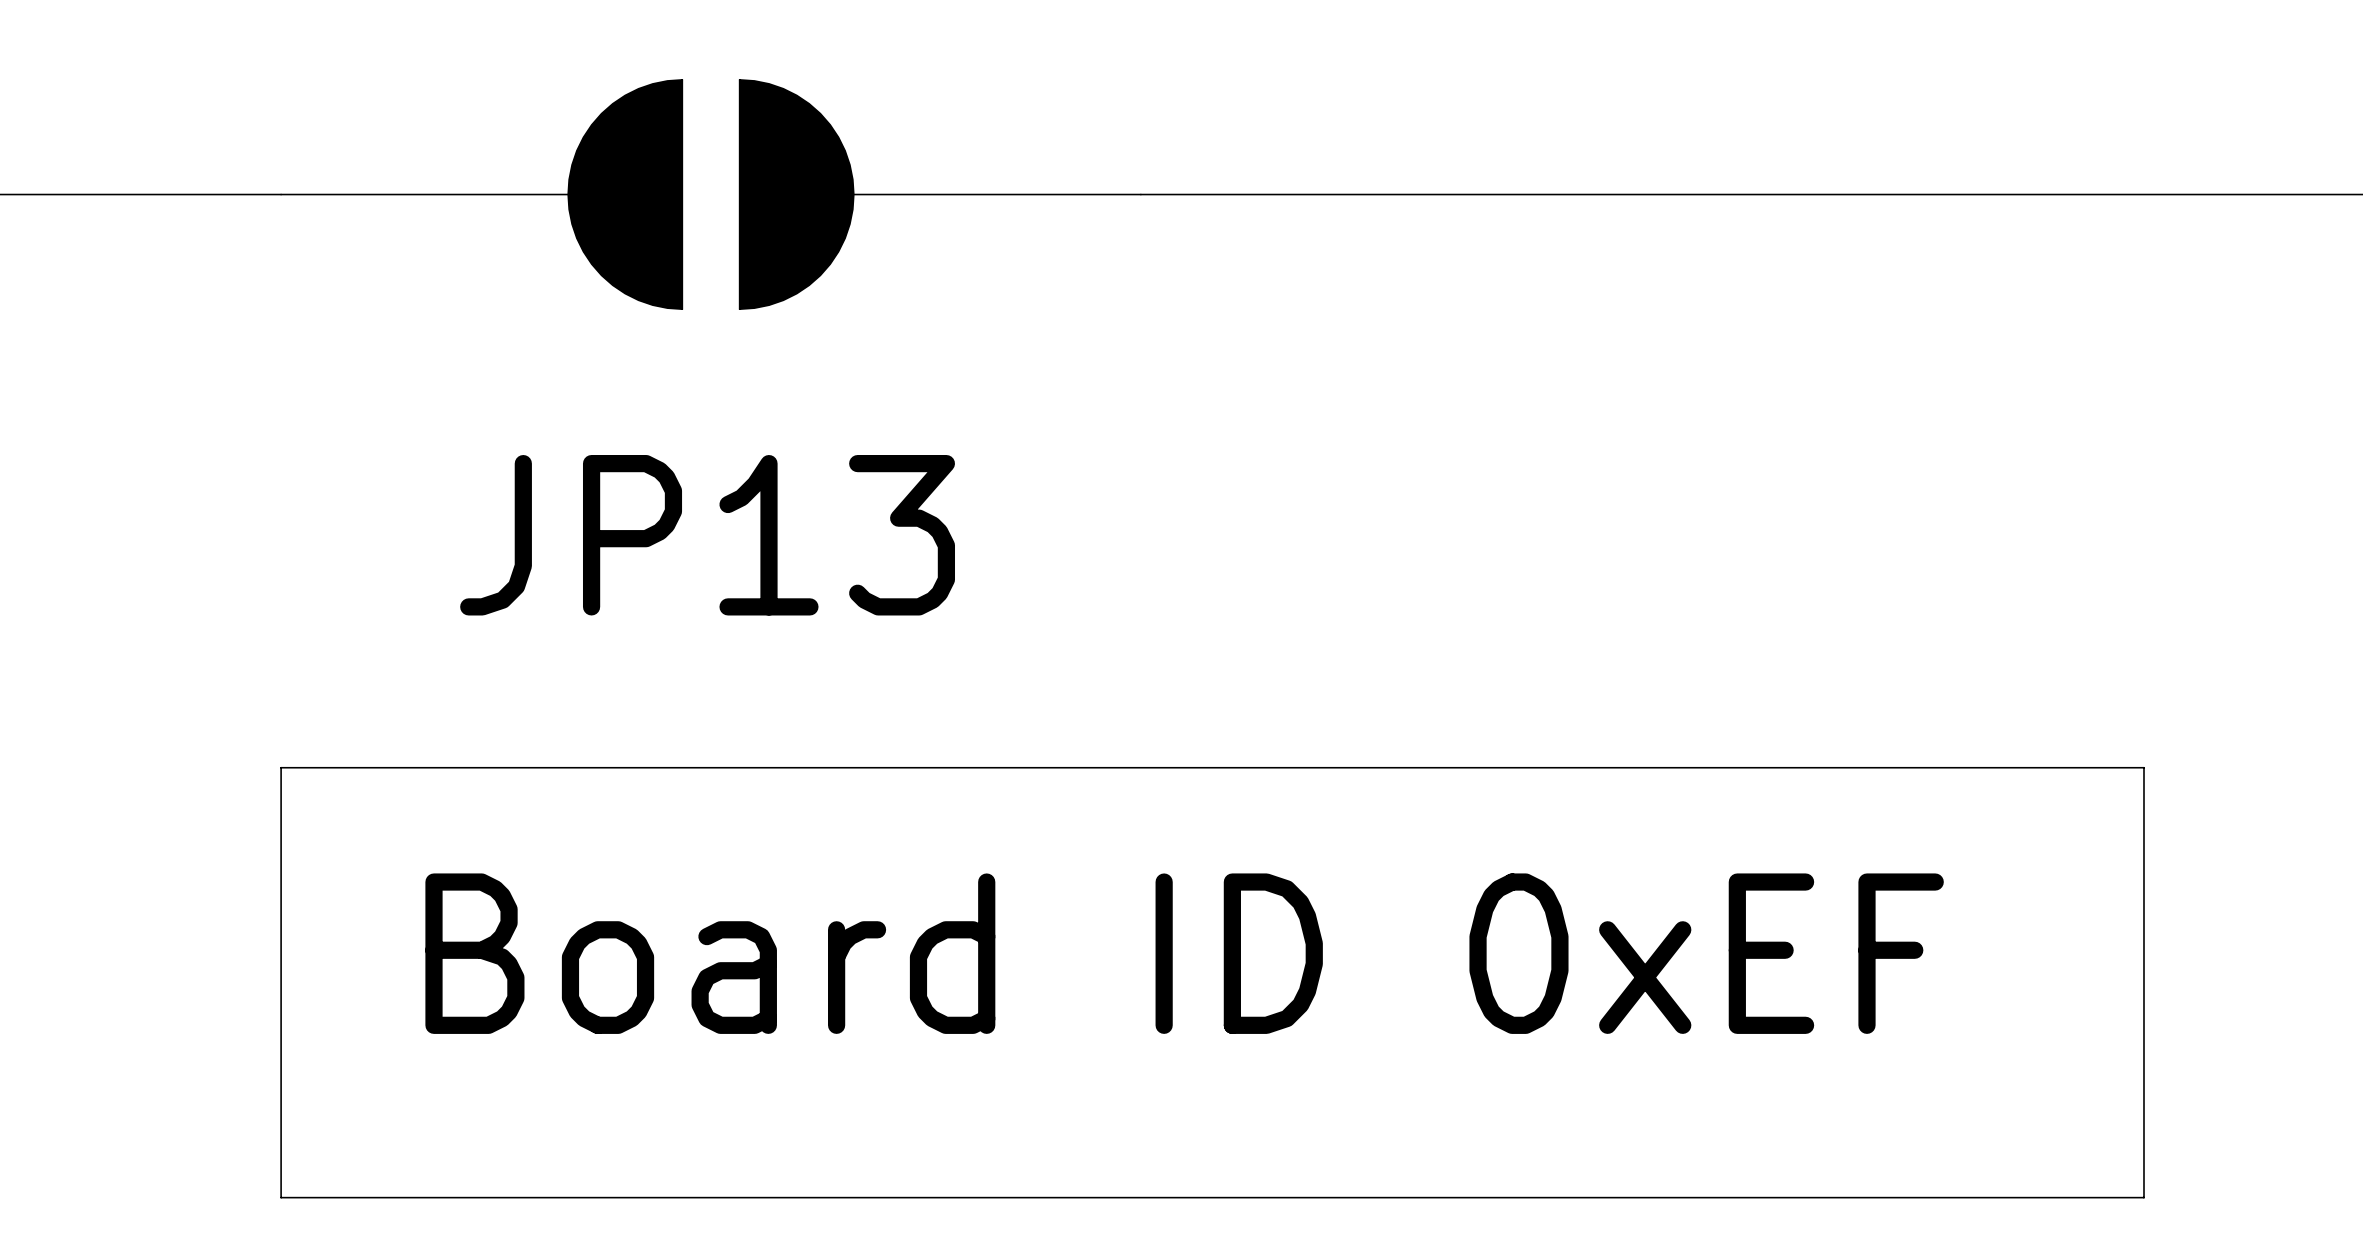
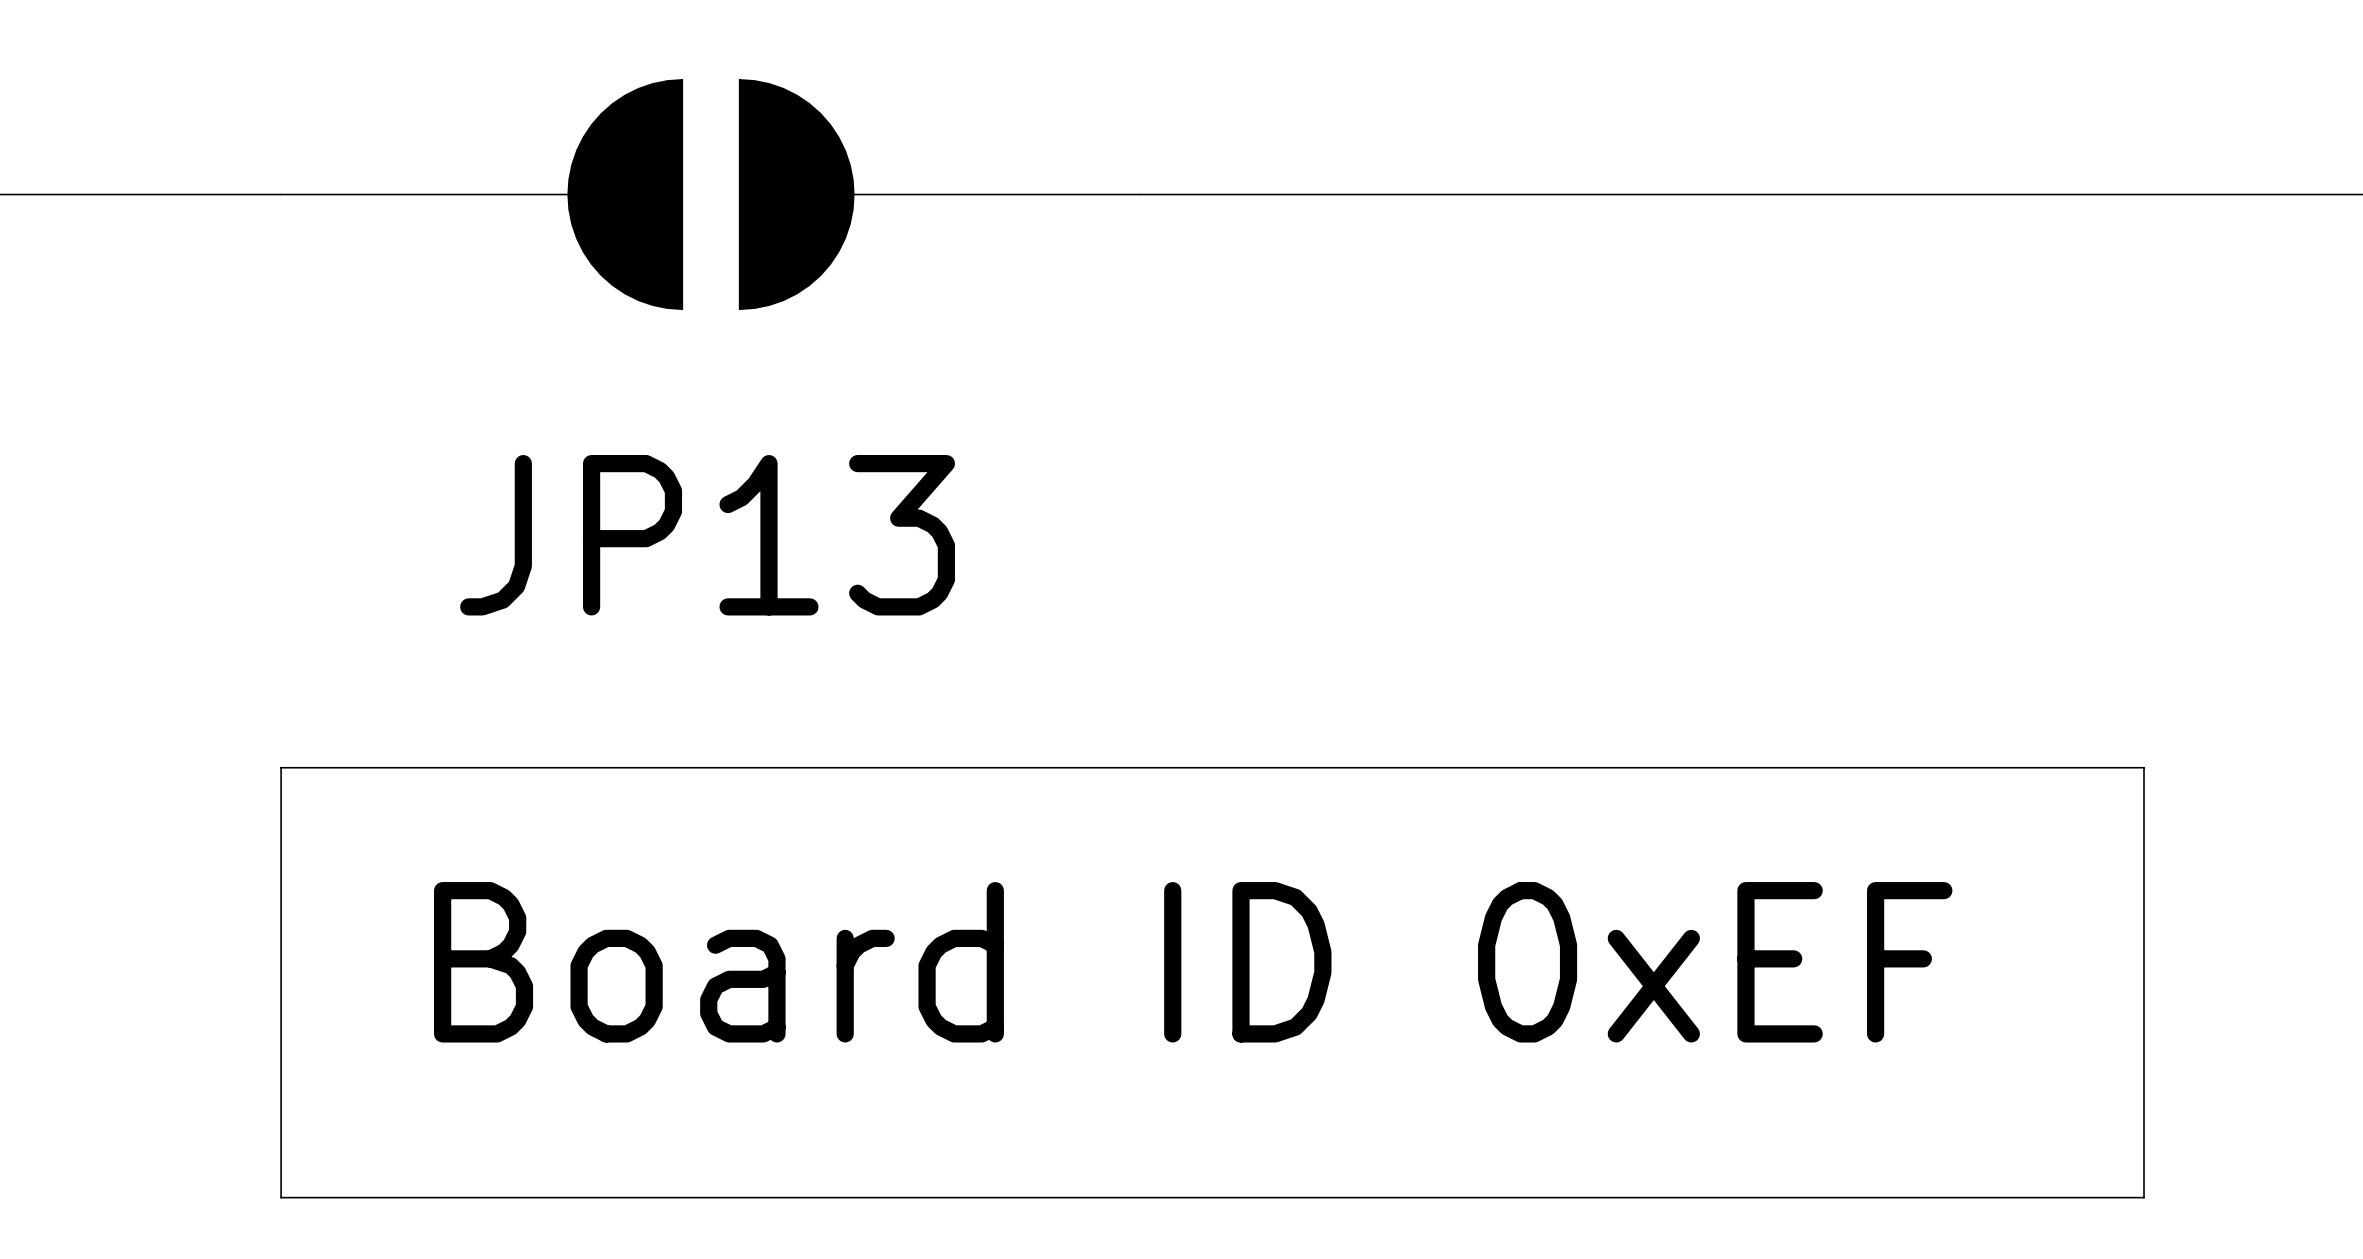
text position: Board ID 0xEF (1184, 953) -> Board ID 0xEF (1193, 962)

